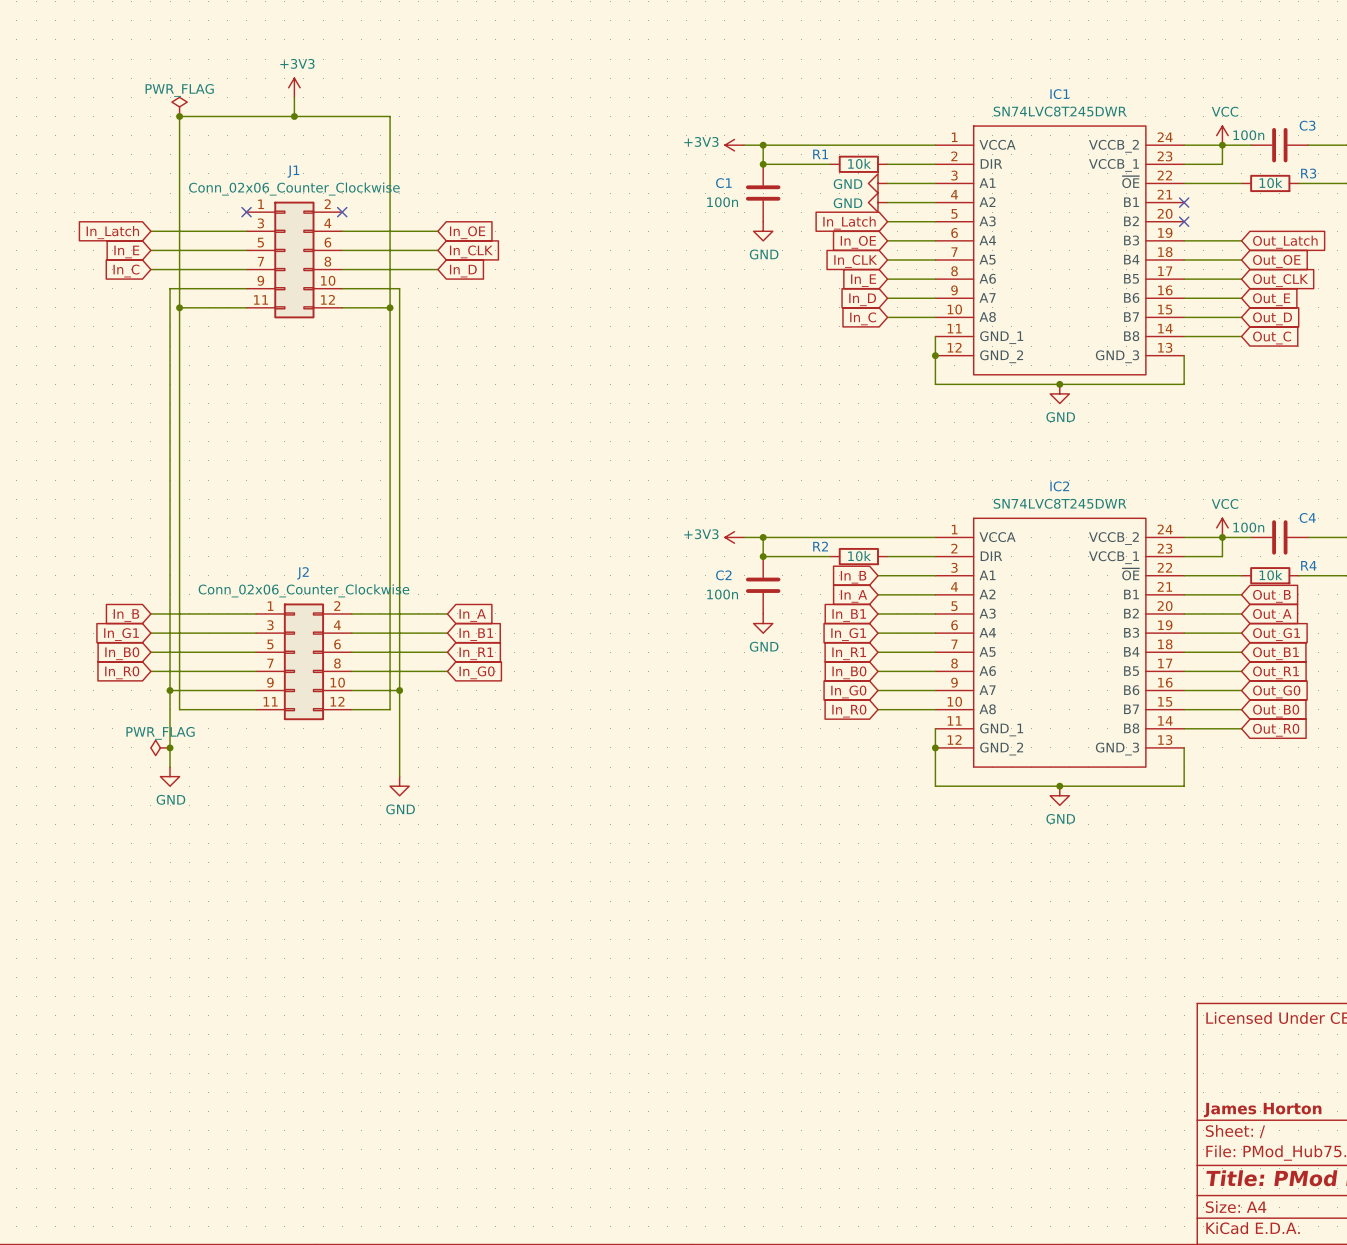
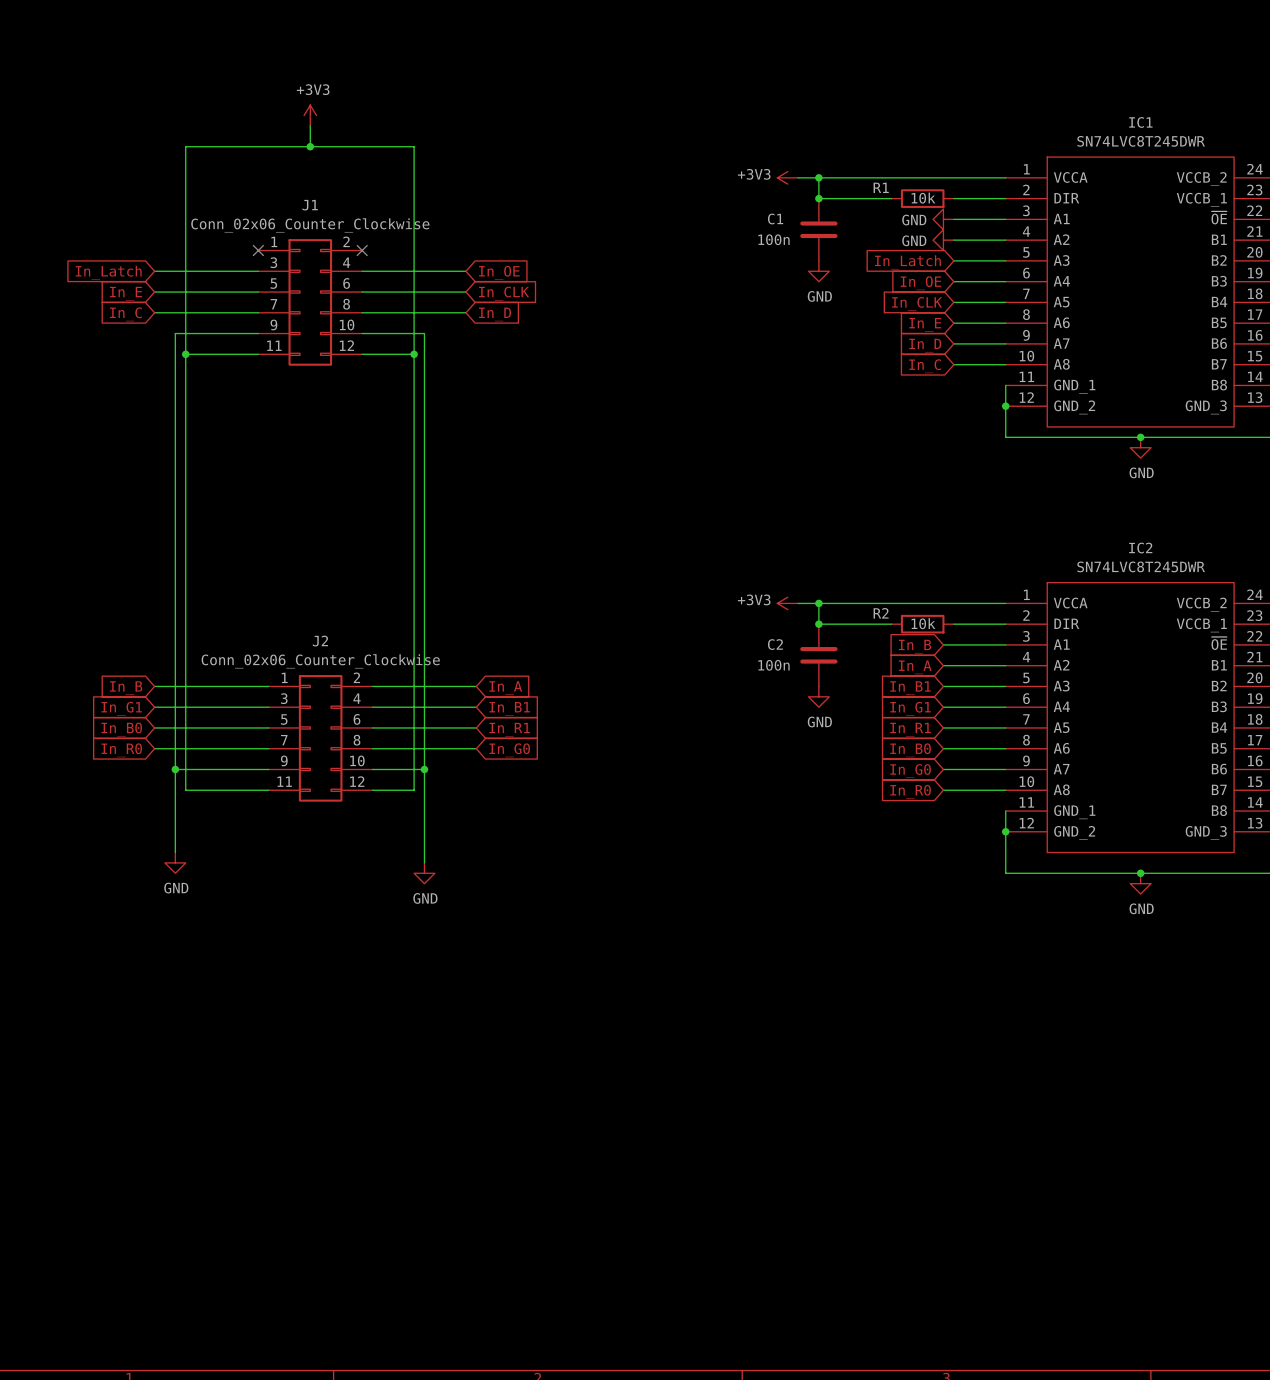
power symbol: PWR_FLAG (179, 106) -> none
junction: (179, 116) -> none
power symbol: PWR_FLAG (160, 747) -> none
junction: (170, 747) -> none

